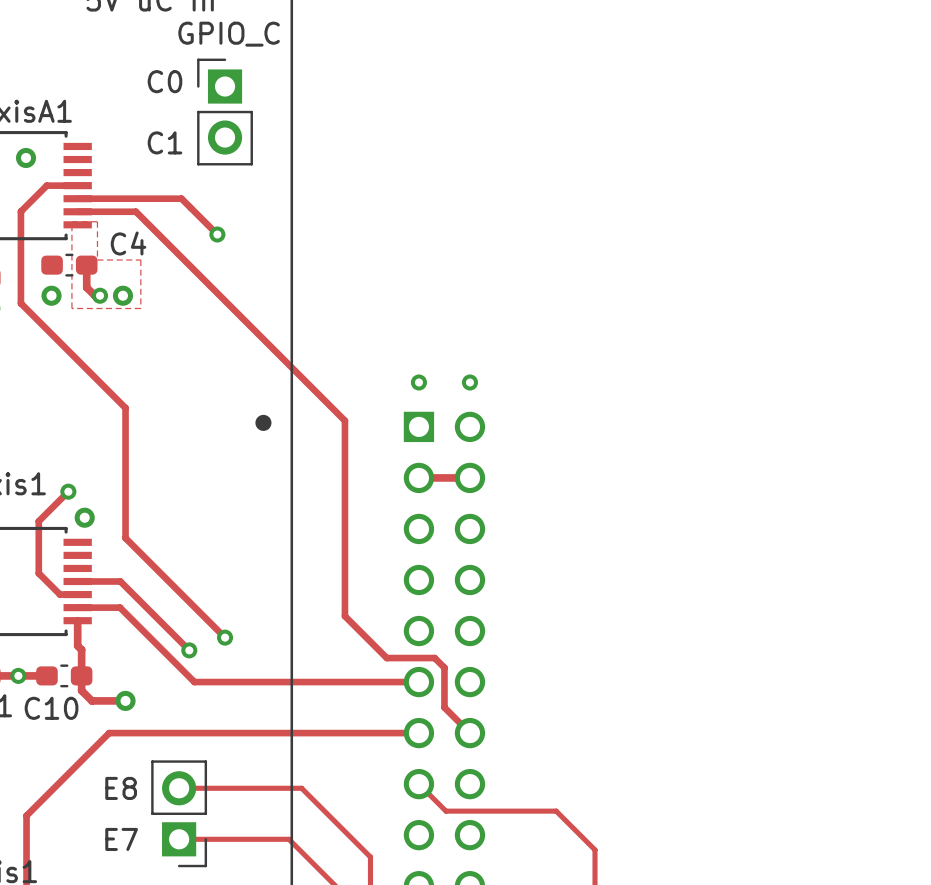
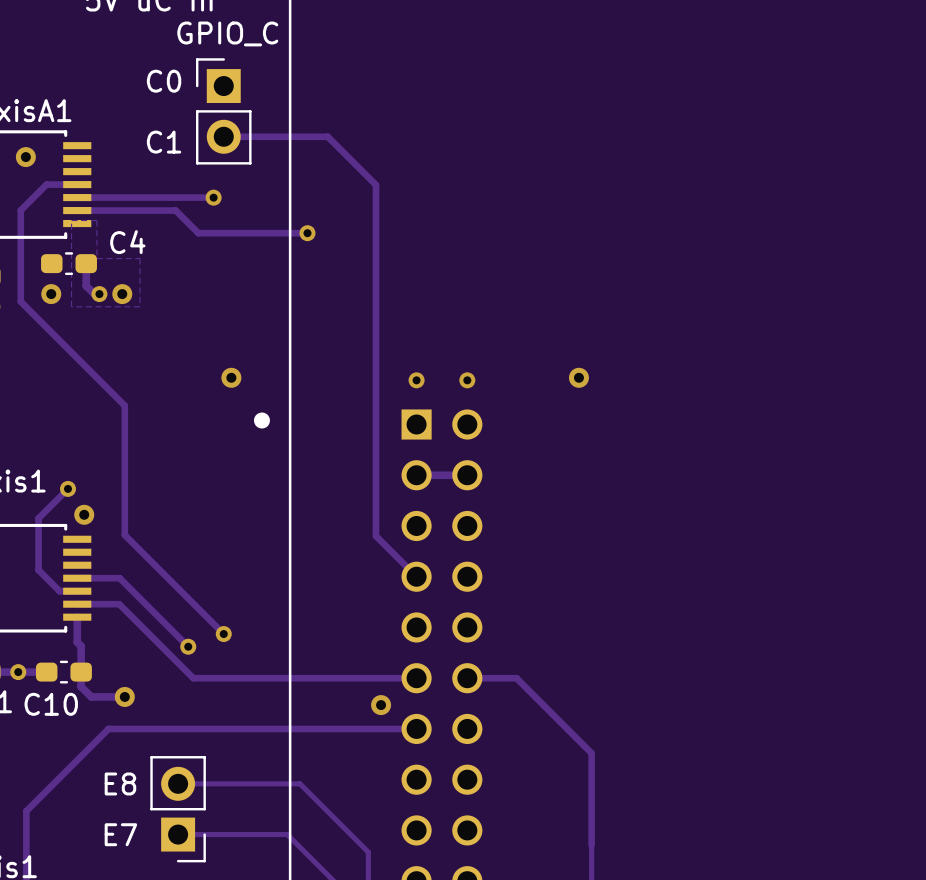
track: none -> (223, 136) (327, 136) (375, 184) (375, 536) (416, 576)
track: (181, 198) (217, 234) -> (180, 197) (213, 197)
track: (135, 211) (344, 420) (344, 616) (386, 658) (434, 658) (444, 667) (444, 707) (469, 733) -> (135, 210) (175, 210) (198, 233) (307, 233)
via position: (217, 234) -> (213, 197)
via: none -> (307, 233)
via: none -> (231, 377)
via: none -> (578, 377)
via: none -> (381, 705)
track: (418, 784) (445, 811) (556, 811) (595, 849) -> (467, 678) (516, 678) (591, 753) (591, 845)

